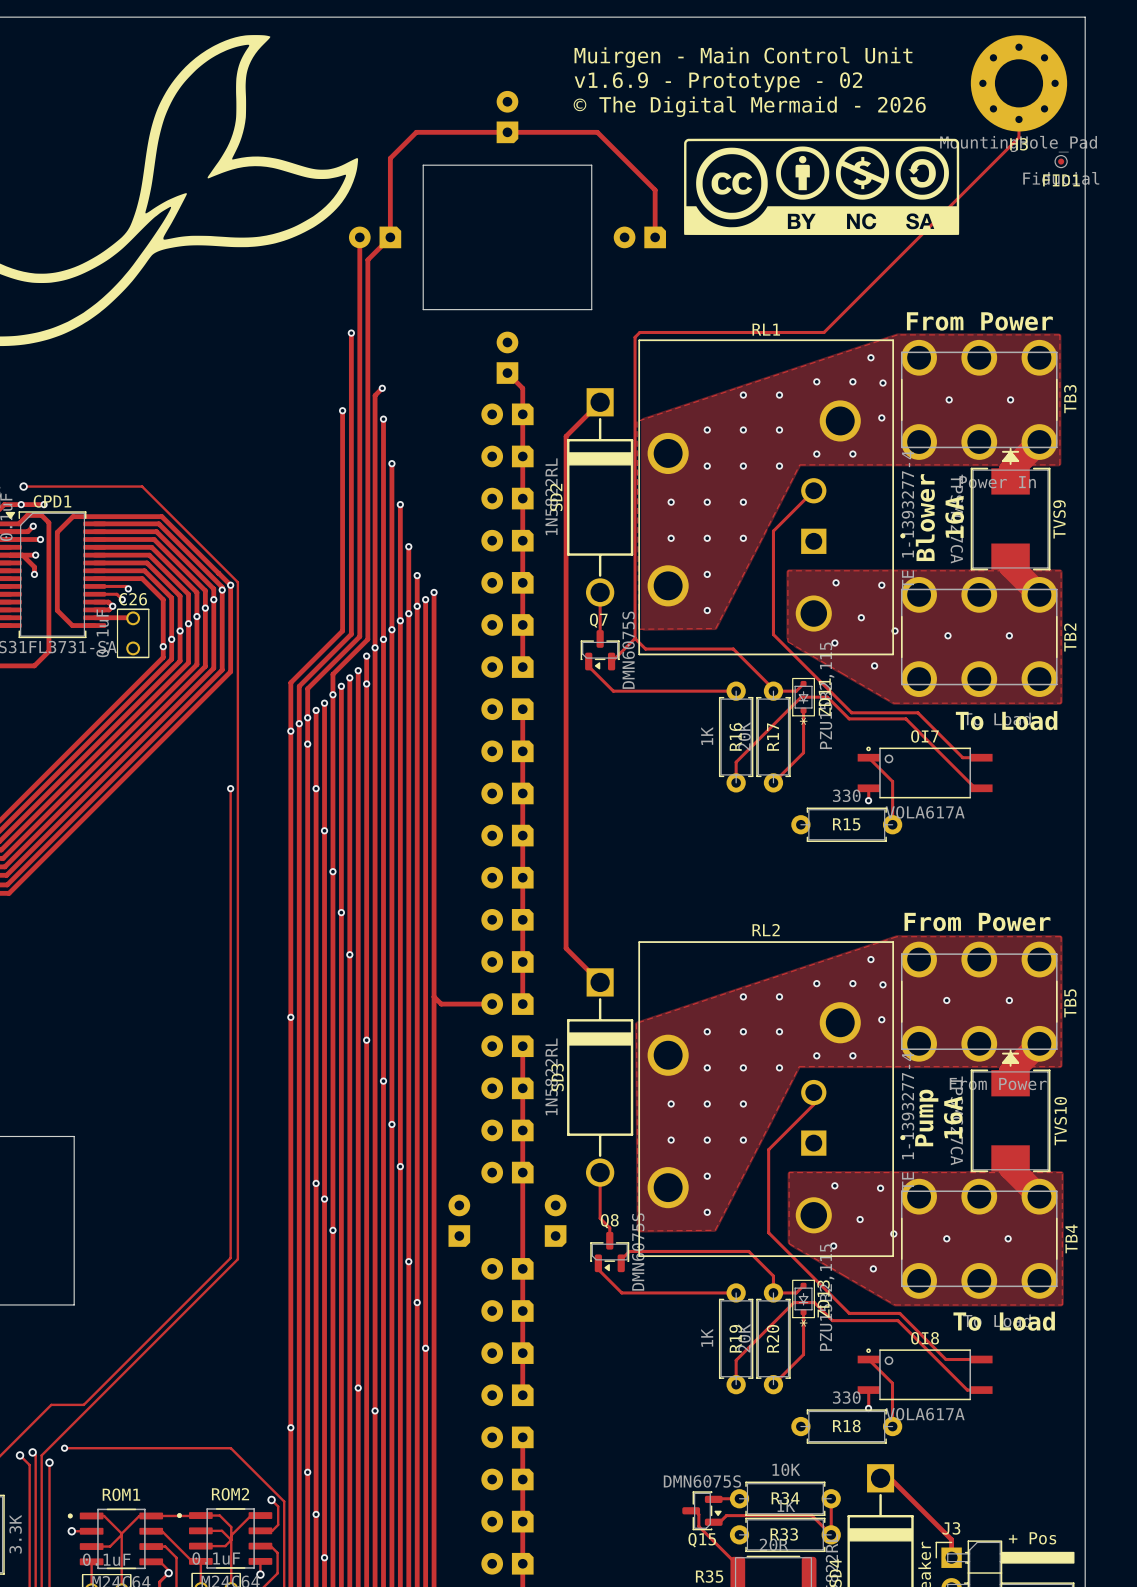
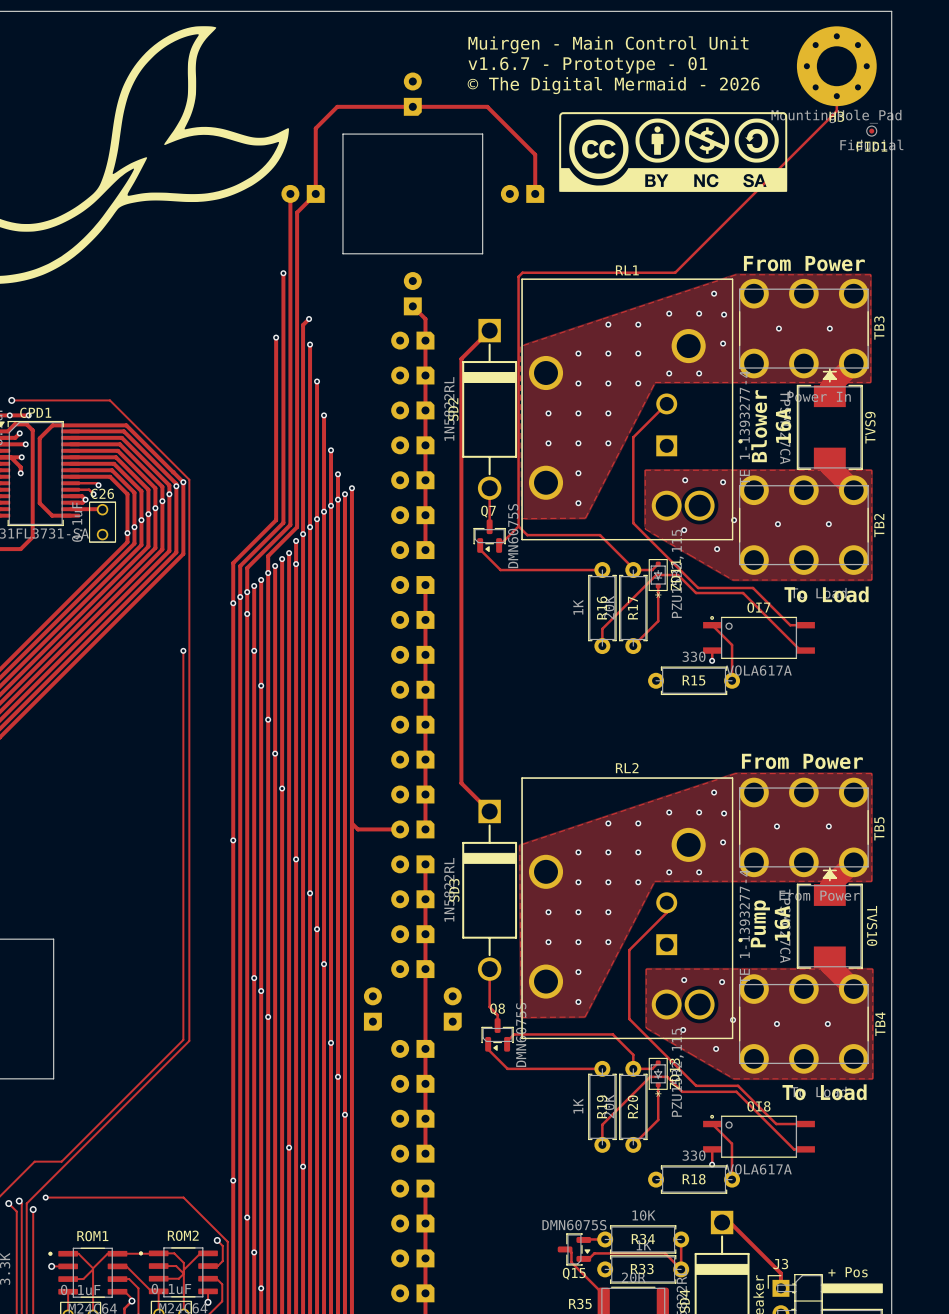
text: v1.6.9 - Prototype - 02 (718, 82) -> v1.6.7 - Prototype - 01 (587, 65)
RL1 footprint: [638, 339, 906, 656] -> [521, 278, 743, 541]
via: (861, 617) -> none
RL2 footprint: [638, 941, 906, 1258] -> [521, 777, 743, 1040]
TVS10 name rotation: 0° (1060, 1121) -> 180° (872, 925)
via: (860, 1219) -> none

